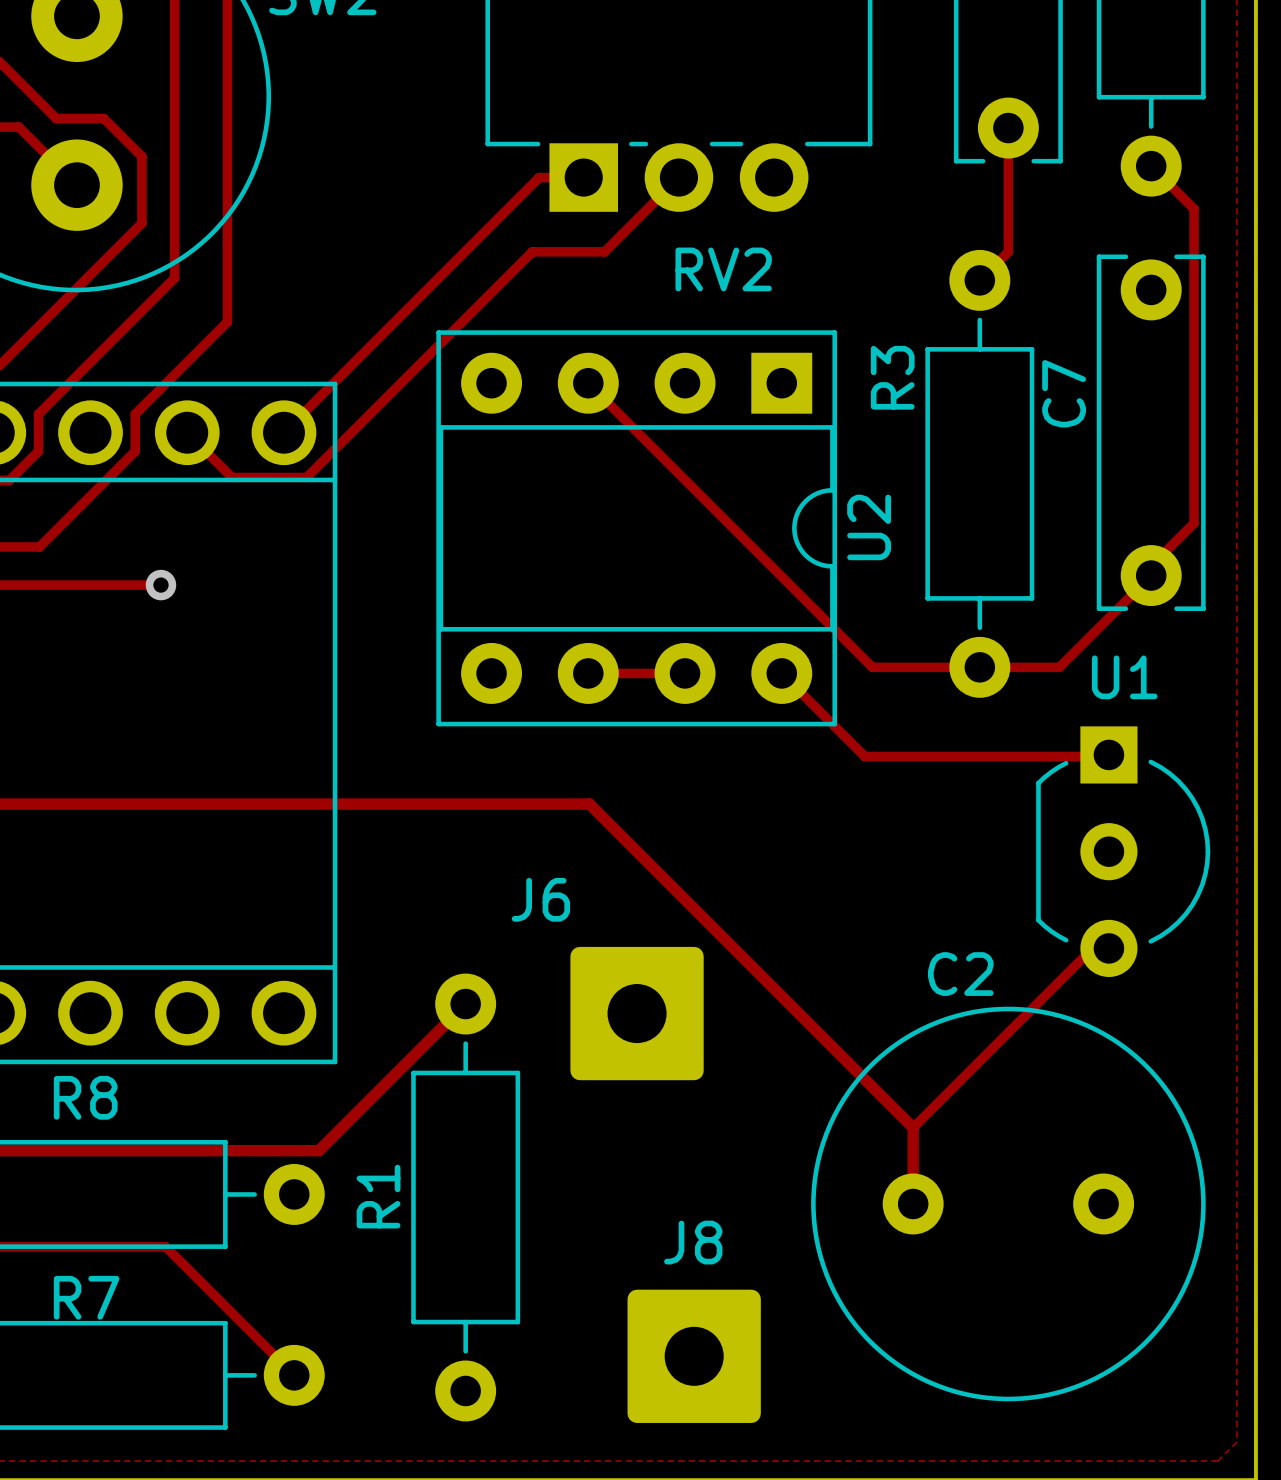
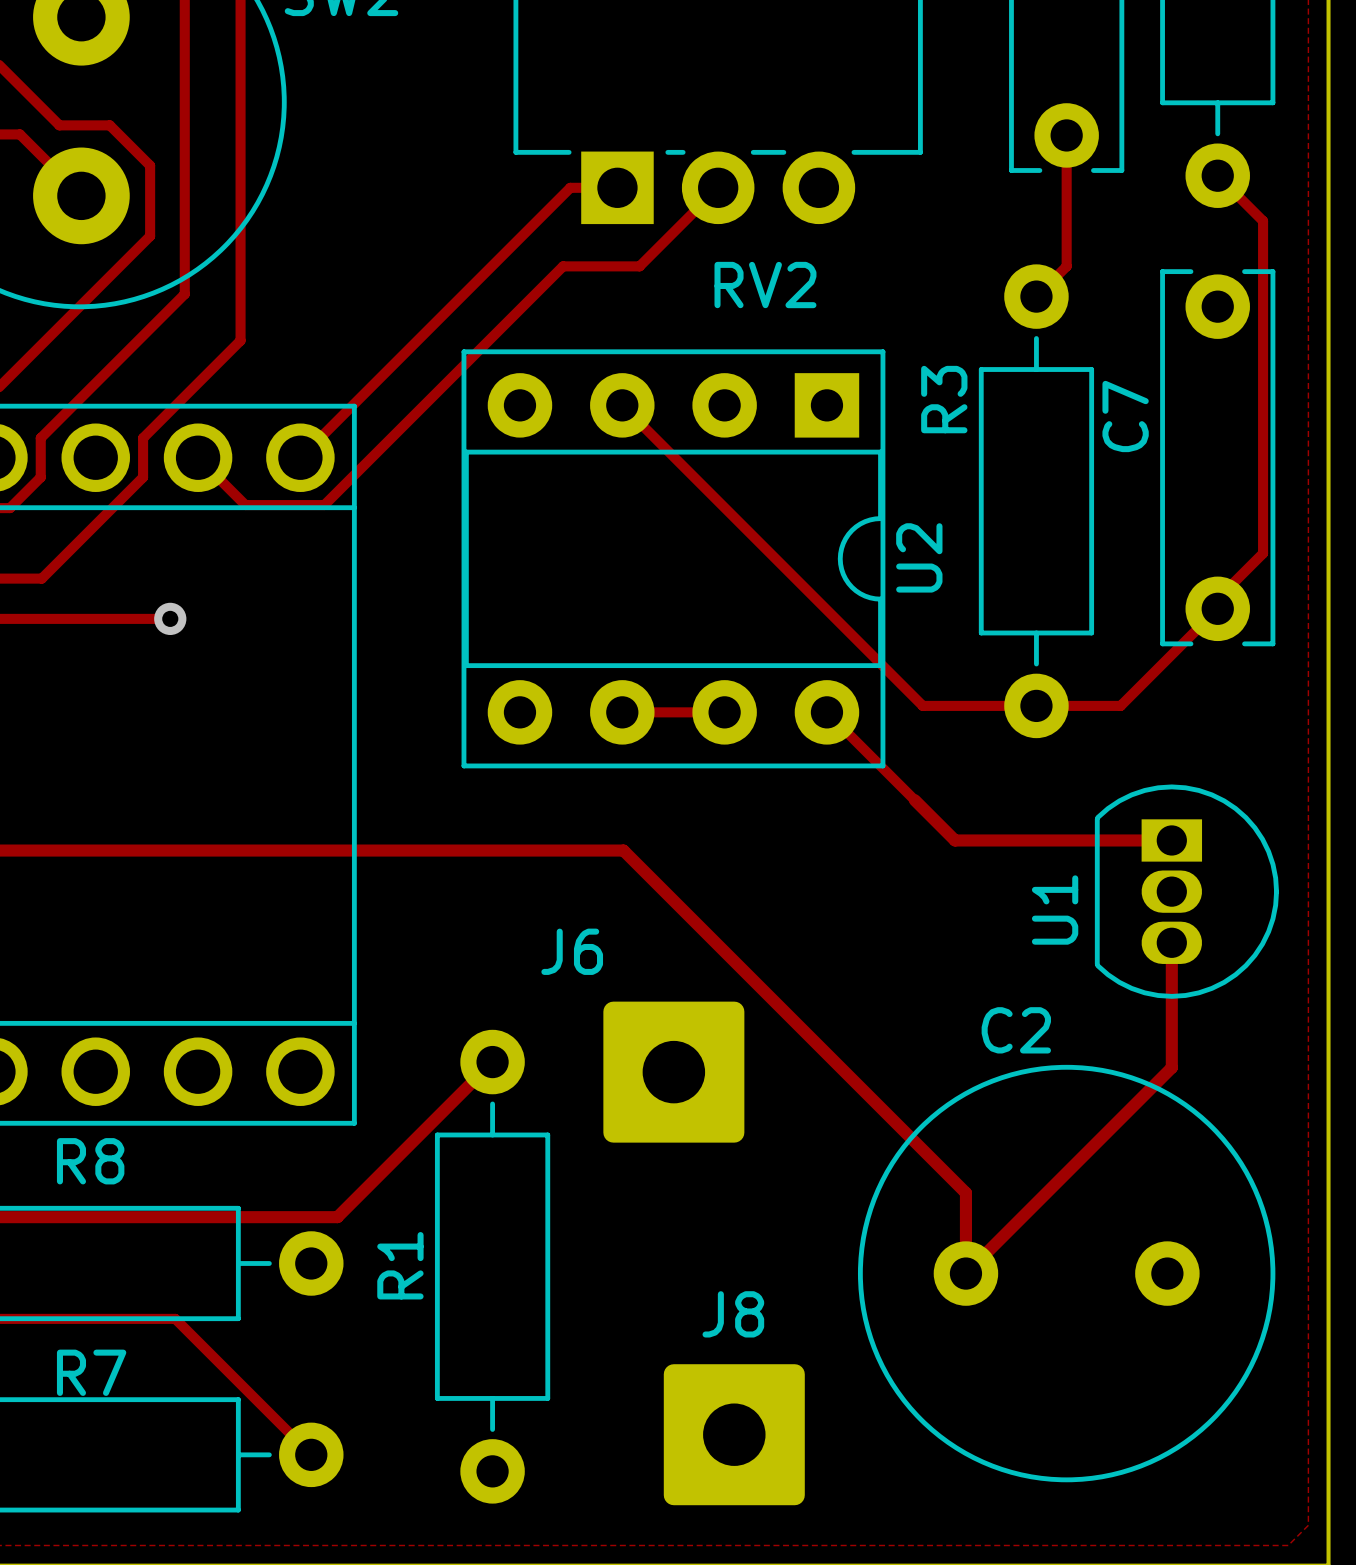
U1 name position: U1 (1124, 677) -> U1 (1055, 910)
U1 footprint: [1036, 726, 1211, 977] -> [1094, 784, 1279, 999]
track: (1108, 754) (1113, 756) (864, 756) -> (1171, 840) (955, 840) (914, 800)
track: none -> (1171, 942) (1171, 1067) (965, 1273)
track: (1108, 948) (1092, 948) (913, 1127) -> none

